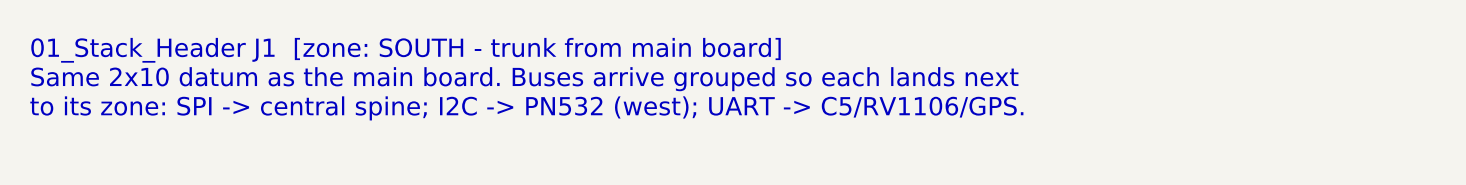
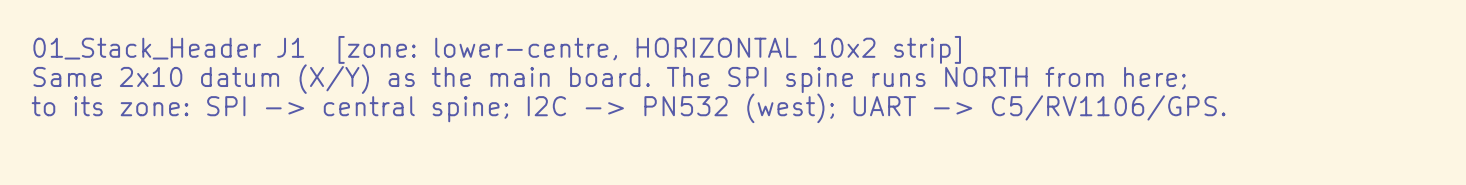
text: 01_Stack_Header J1 [zone: SOUTH - trunk from main board] (406, 50) -> 01_Stack_Header J1 [zone: lower-centre, HORIZONTAL 10x2 strip] (497, 49)
text: Same 2x10 datum as the main board. Buses arrive grouped so each lands next (524, 79) -> Same 2x10 datum (X/Y) as the main board. The SPI spine runs NORTH from here; (609, 79)

